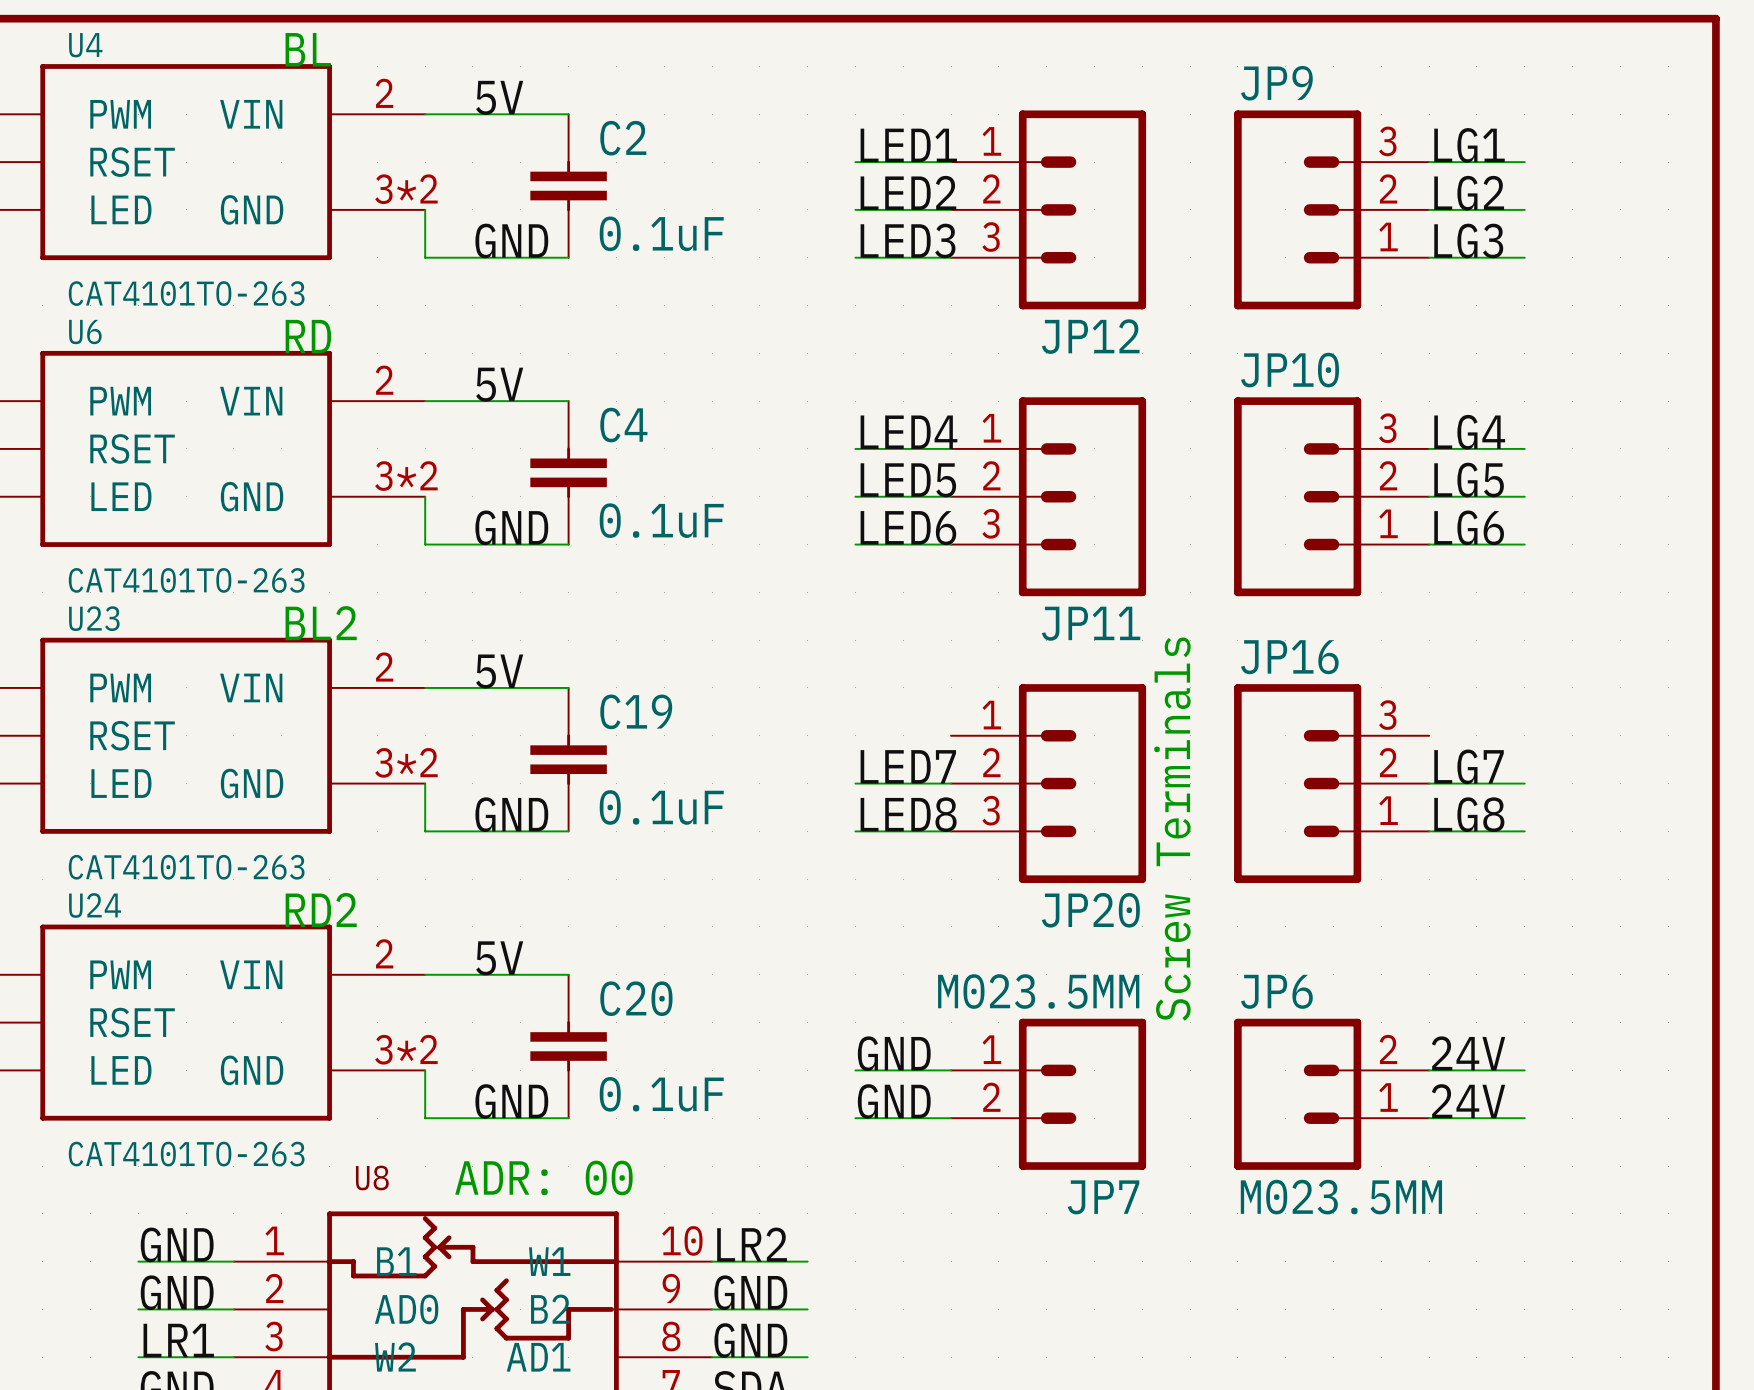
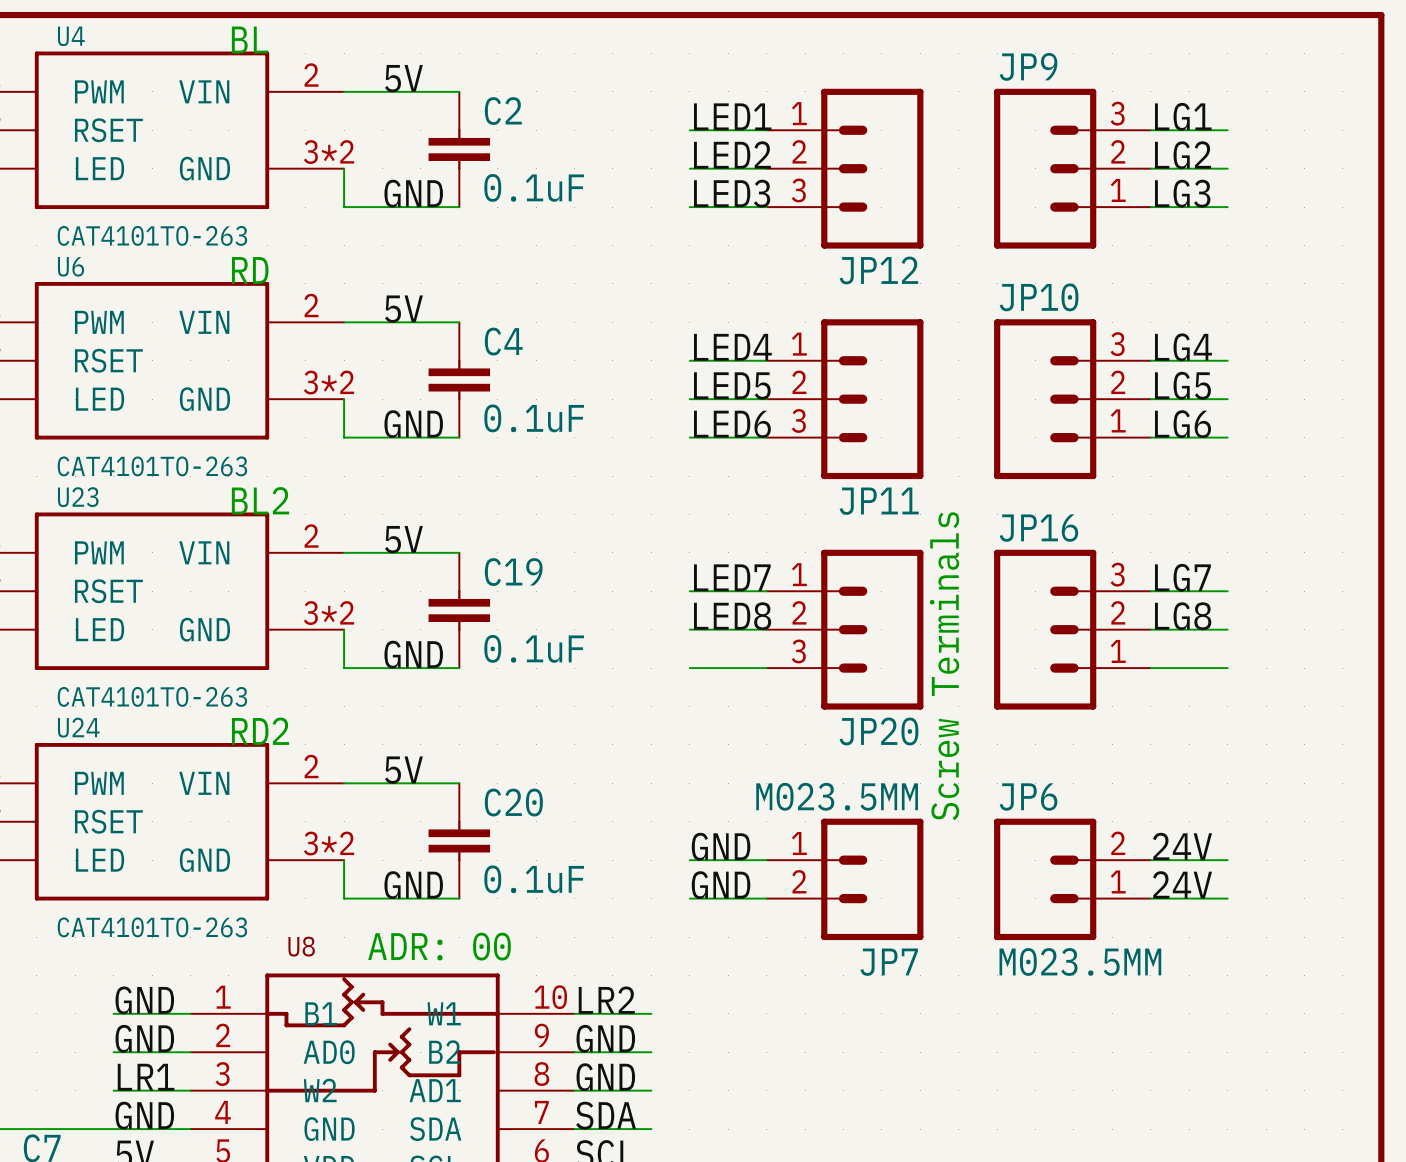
label: none -> LED7 (732, 577)
label: none -> LG7 (1182, 577)
wire: none -> (689, 591) (766, 591)
wire: none -> (1150, 591) (1227, 591)
label: LED7 (908, 766) -> LED8 (732, 616)
label: LG7 (1469, 766) -> LG8 (1183, 616)
label: LED8 (908, 814) -> none
label: LG8 (1469, 814) -> none

